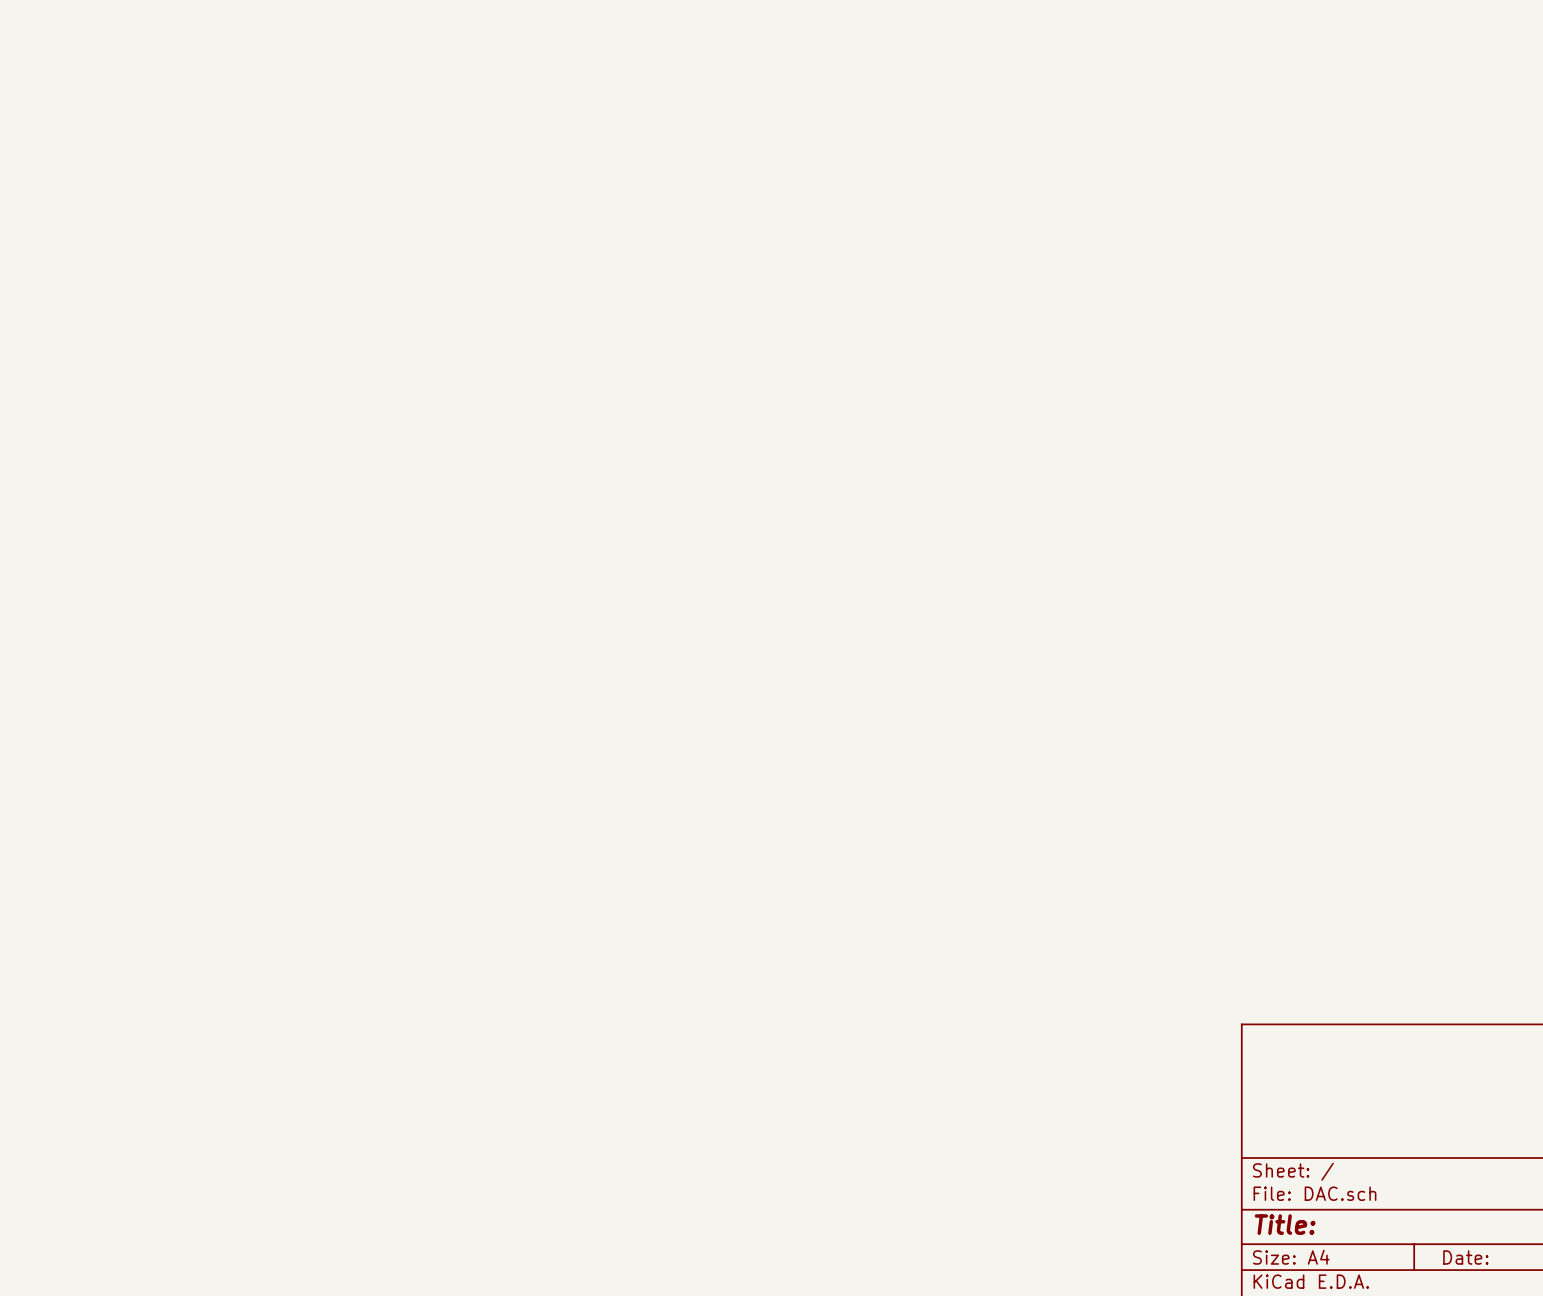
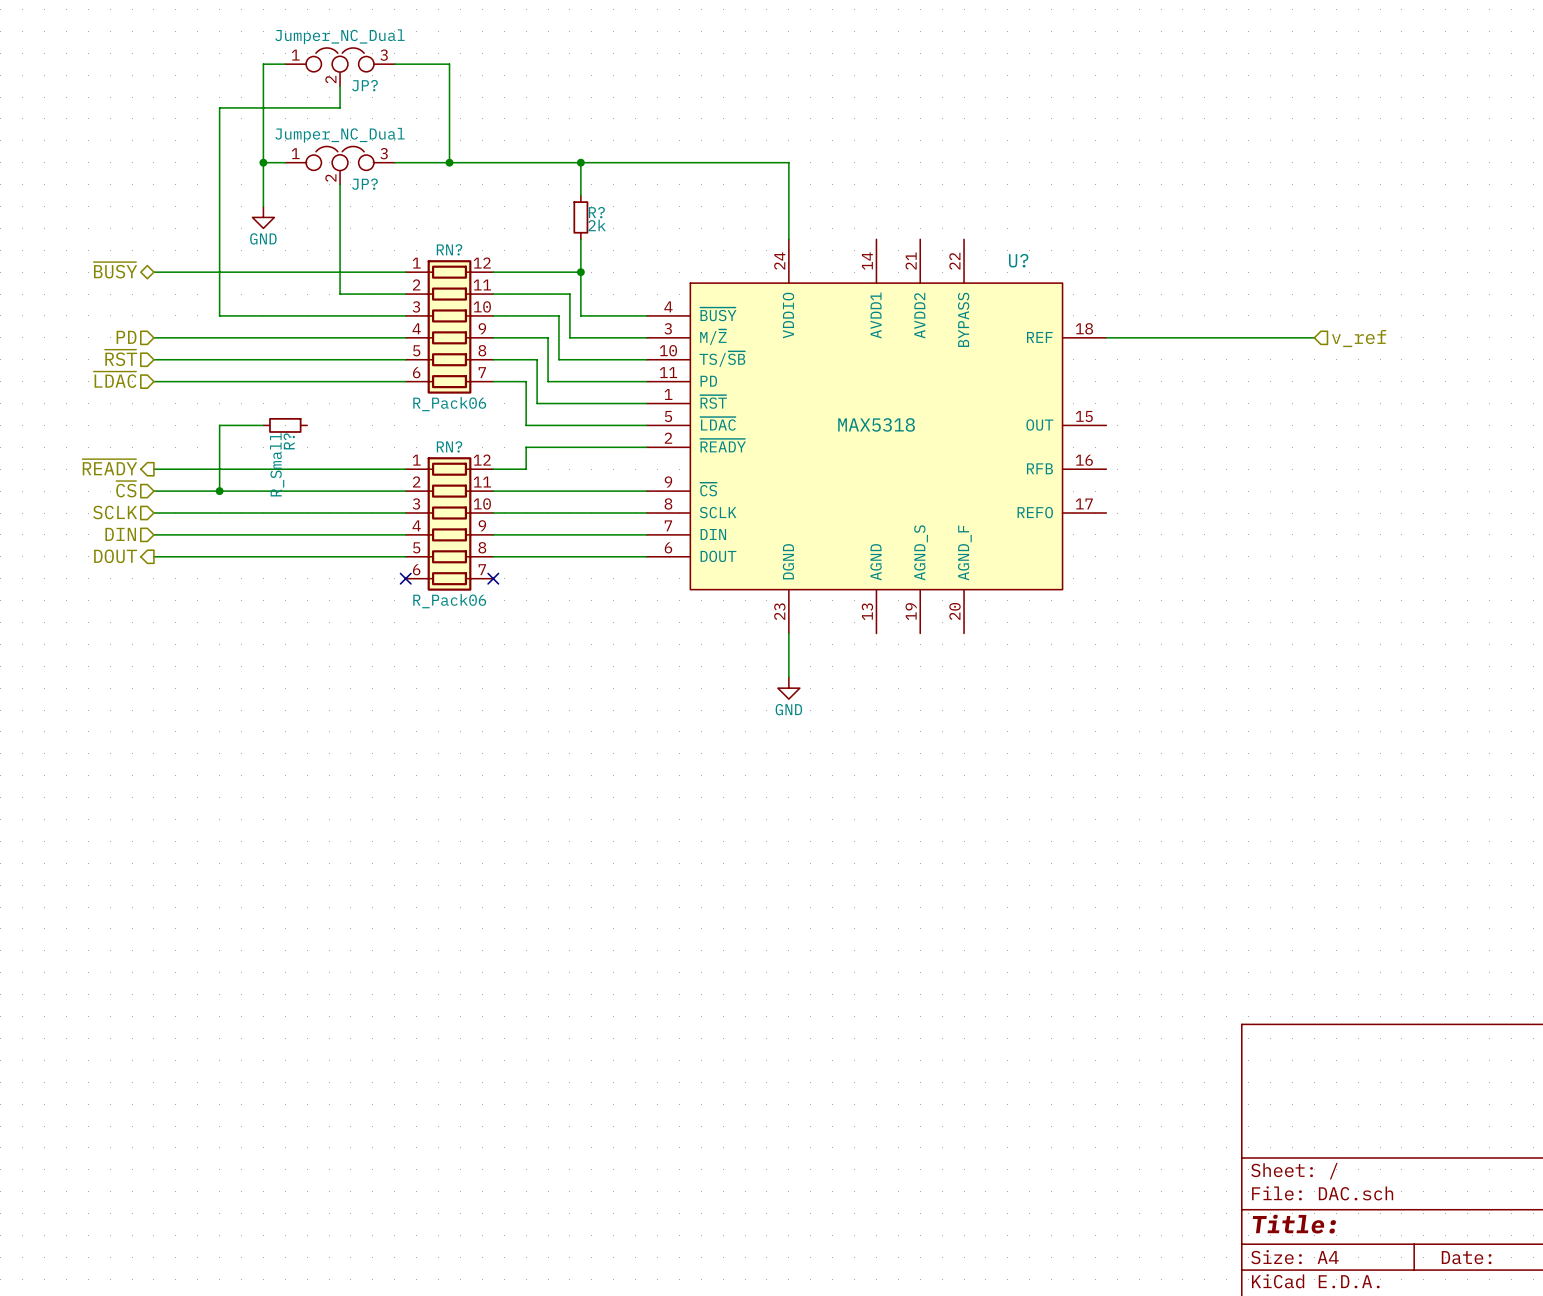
wire: none -> (285, 64) (263, 64) (263, 206)
wire: none -> (394, 64) (449, 64) (449, 162)
JP?: none -> Jumper_NC_Dual (340, 67)
wire: none -> (340, 86) (340, 107) (219, 107) (219, 315) (405, 315)
wire: none -> (263, 162) (285, 162)
junction: none -> (263, 162)
wire: none -> (394, 162) (788, 162) (788, 239)
junction: none -> (449, 162)
wire: none -> (580, 162) (580, 195)
junction: none -> (580, 162)
JP?: none -> Jumper_NC_Dual (340, 165)
wire: none -> (340, 184) (340, 294) (405, 294)
power symbol: none -> GND (263, 217)
R?: none -> 2k (580, 217)
wire: none -> (580, 239) (580, 315) (646, 315)
hierarchical label: none -> ~{BUSY} (115, 270)
wire: none -> (153, 272) (405, 272)
wire: none -> (493, 272) (580, 272)
junction: none -> (580, 272)
wire: none -> (493, 294) (569, 294) (569, 337) (646, 337)
wire: none -> (493, 315) (558, 315) (558, 359) (646, 359)
RN?: none -> R_Pack06 (449, 326)
hierarchical label: none -> PD (126, 337)
wire: none -> (153, 337) (405, 337)
wire: none -> (493, 337) (548, 337) (548, 381) (646, 381)
wire: none -> (1106, 337) (1314, 337)
hierarchical label: none -> v_ref (1359, 338)
hierarchical label: none -> ~{RST} (120, 357)
wire: none -> (153, 359) (405, 359)
wire: none -> (493, 359) (537, 359) (537, 403) (646, 403)
hierarchical label: none -> ~{LDAC} (115, 379)
wire: none -> (153, 381) (405, 381)
wire: none -> (493, 381) (526, 381) (526, 425) (646, 425)
wire: none -> (263, 425) (219, 425) (219, 491)
R?: none -> R_Small (285, 425)
U?: none -> MAX5318 (876, 436)
wire: none -> (646, 447) (526, 447) (526, 469) (493, 469)
hierarchical label: none -> ~{READY} (109, 467)
wire: none -> (153, 469) (405, 469)
hierarchical label: none -> ~{CS} (126, 489)
wire: none -> (153, 491) (405, 491)
junction: none -> (219, 491)
wire: none -> (493, 491) (646, 491)
hierarchical label: none -> SCLK (115, 512)
wire: none -> (153, 513) (405, 513)
wire: none -> (493, 513) (646, 513)
RN?: none -> R_Pack06 (449, 523)
hierarchical label: none -> DIN (120, 534)
wire: none -> (153, 534) (405, 534)
wire: none -> (493, 534) (646, 534)
hierarchical label: none -> DOUT (115, 556)
wire: none -> (153, 556) (405, 556)
wire: none -> (493, 556) (646, 556)
no-connect mark: none -> (405, 578)
no-connect mark: none -> (493, 578)
wire: none -> (788, 633) (788, 677)
power symbol: none -> GND (788, 688)

